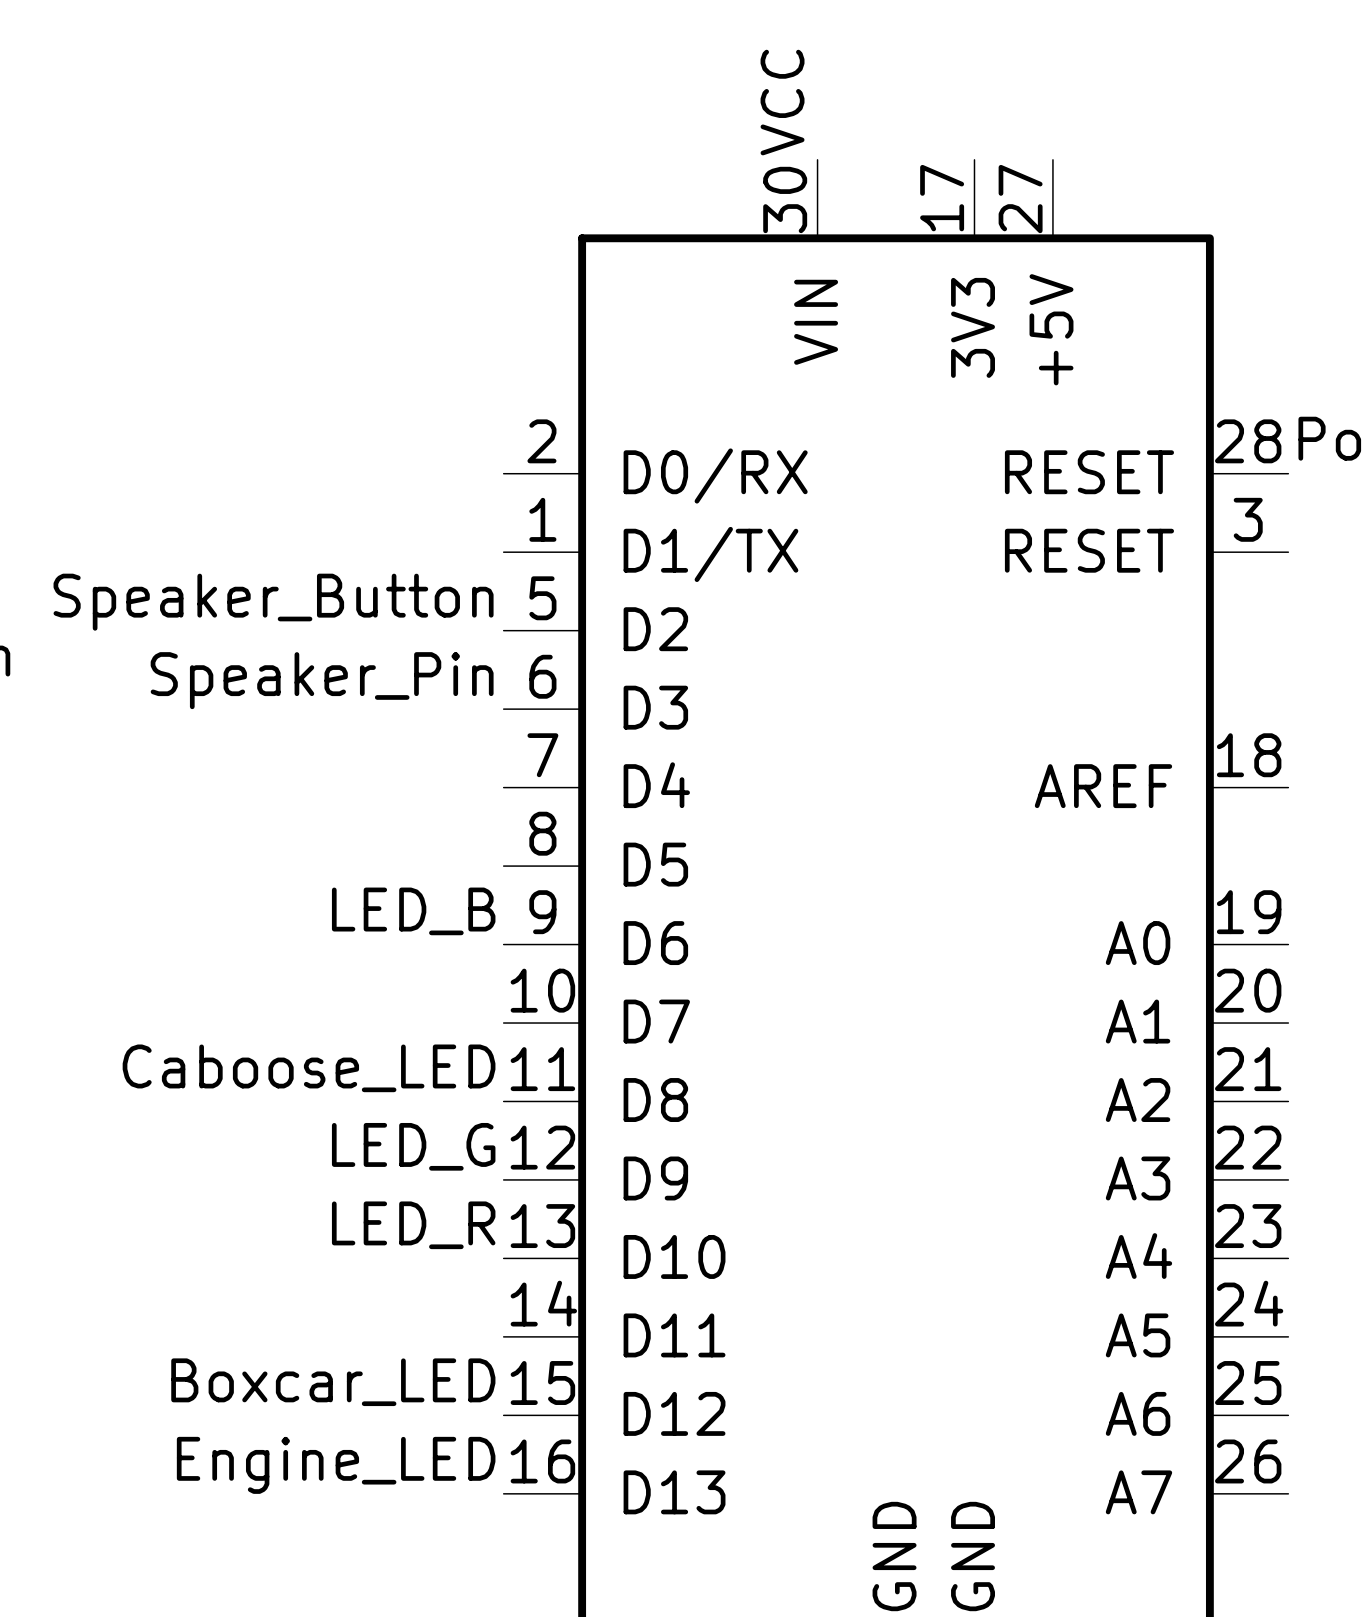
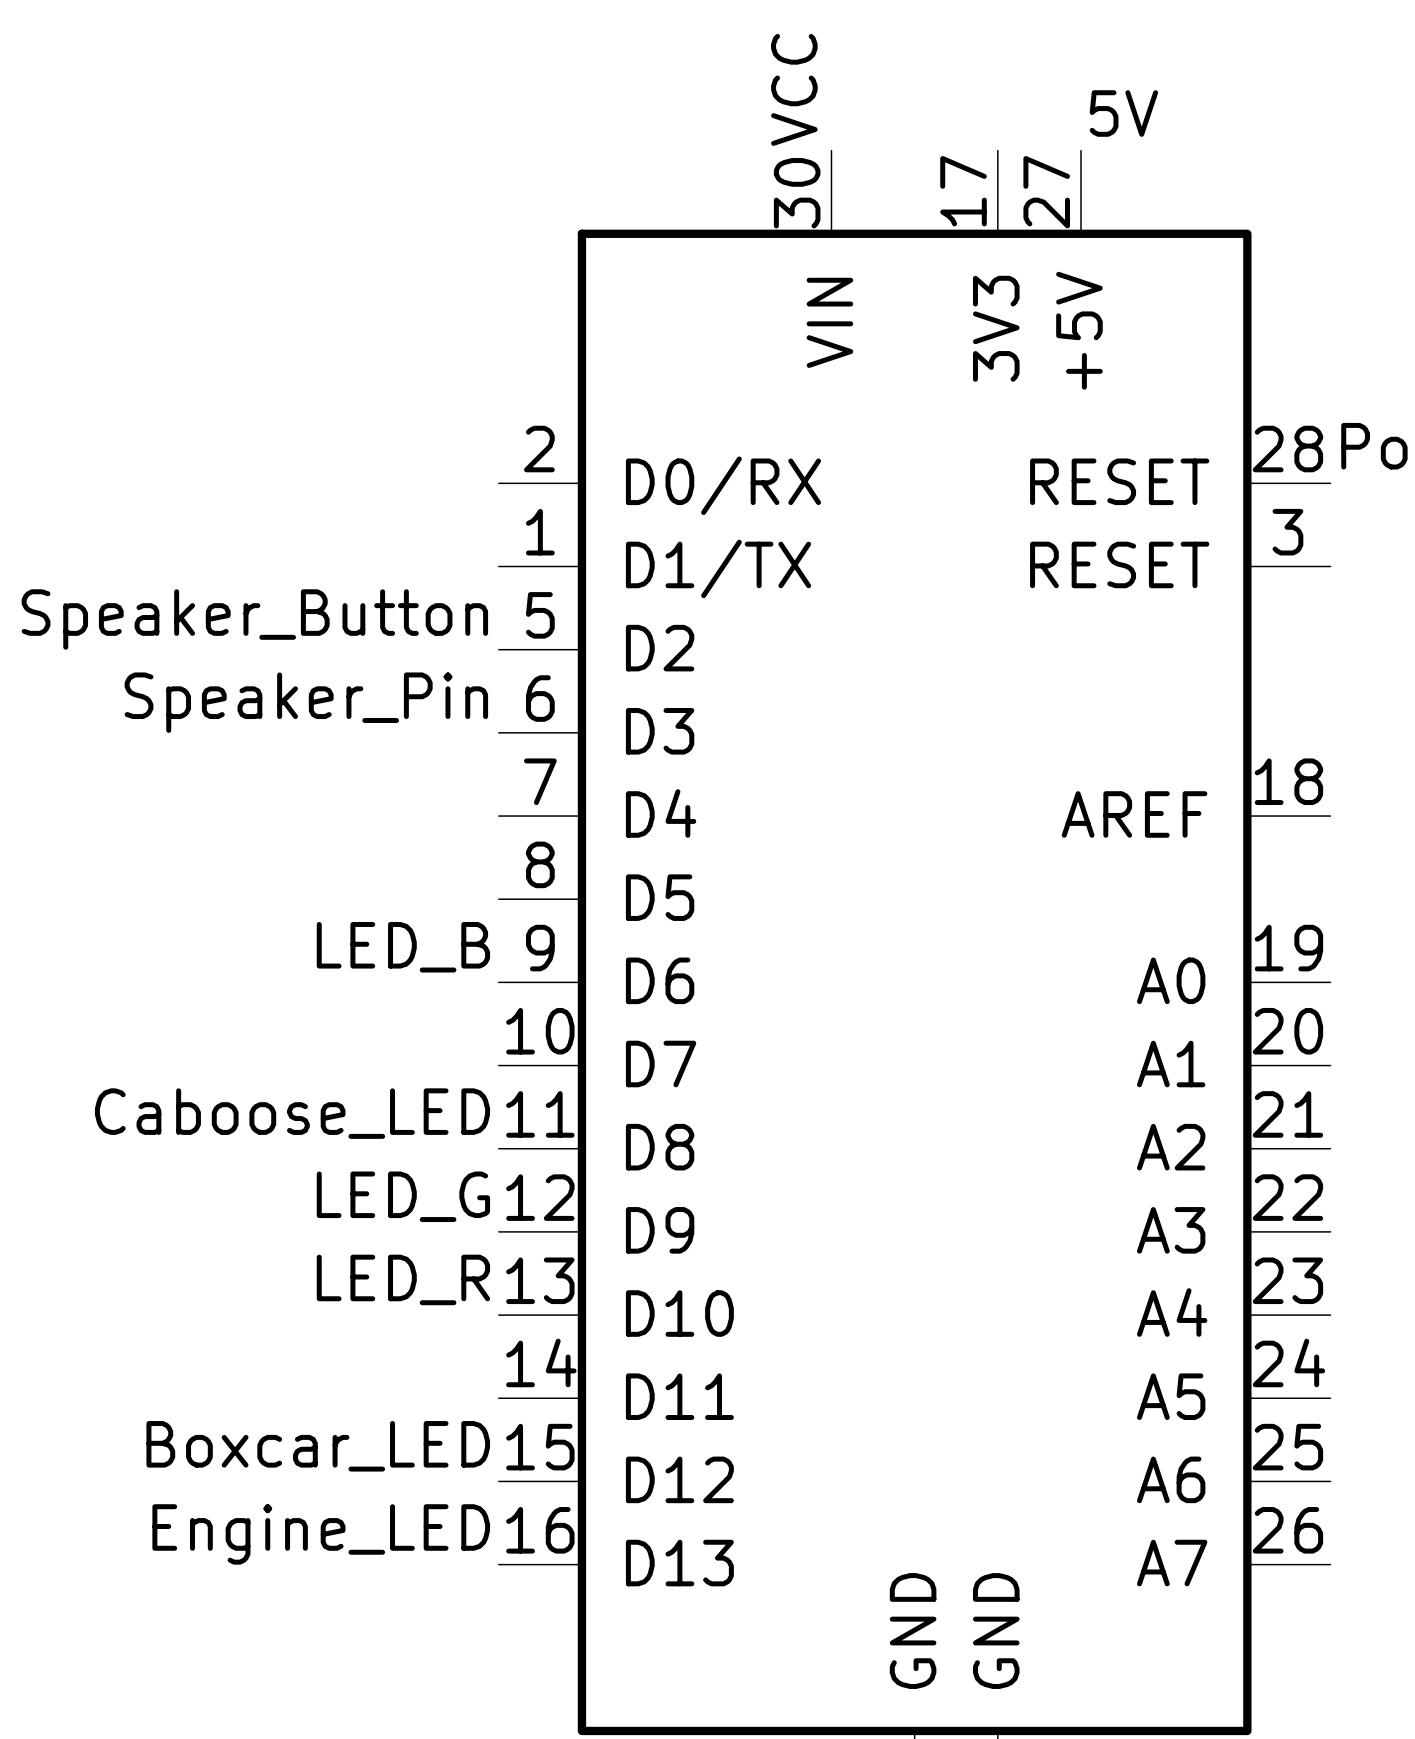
label: none -> 5V (1123, 113)

